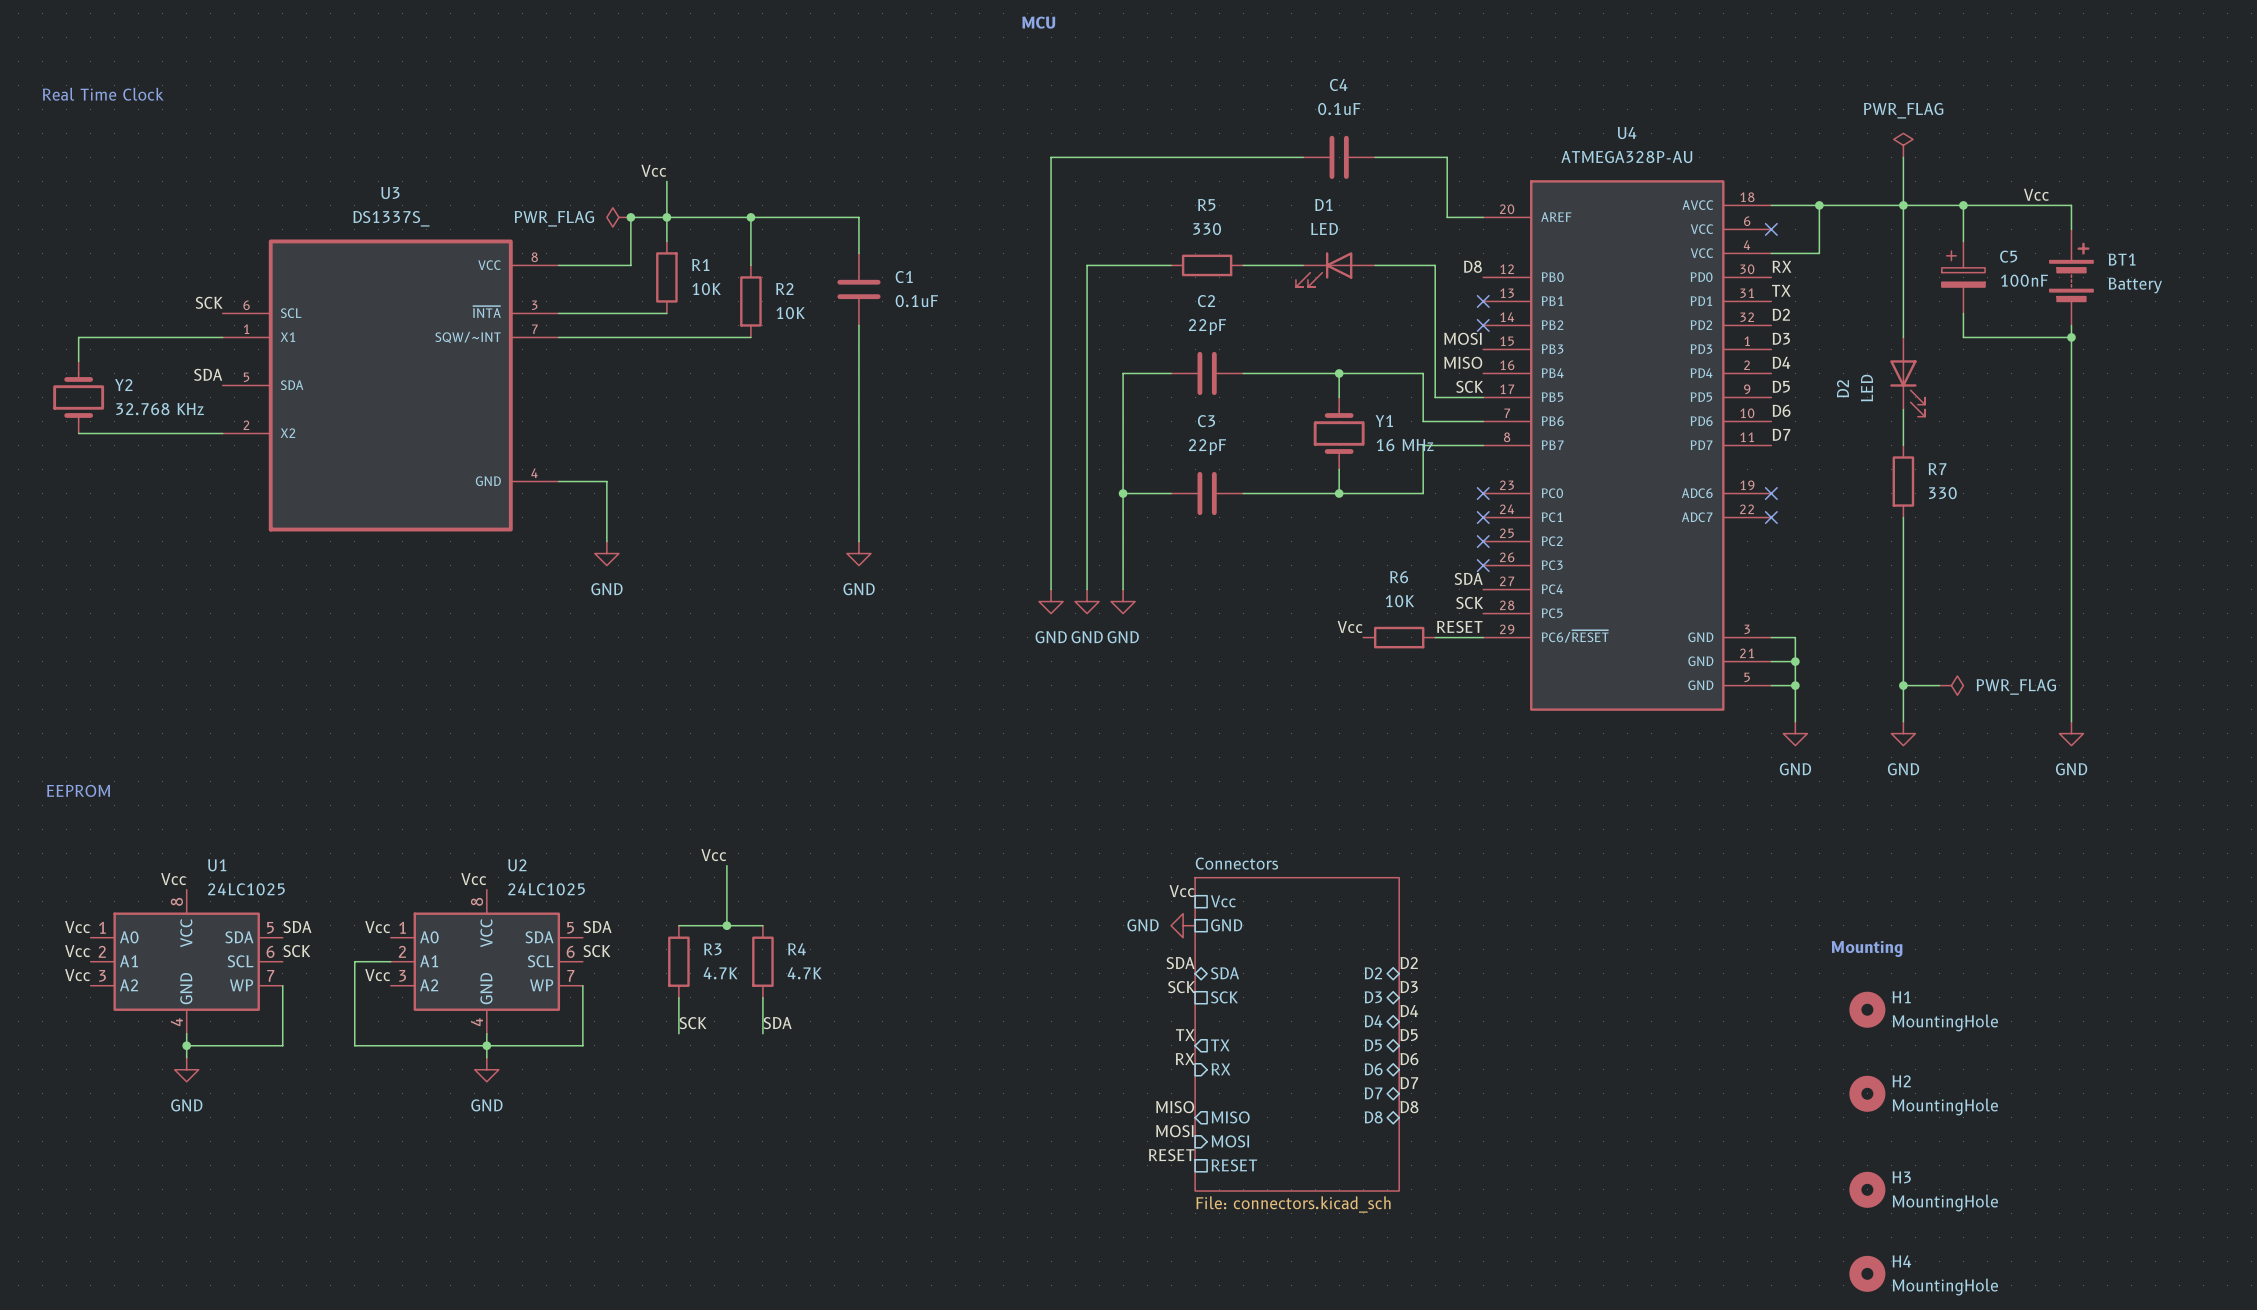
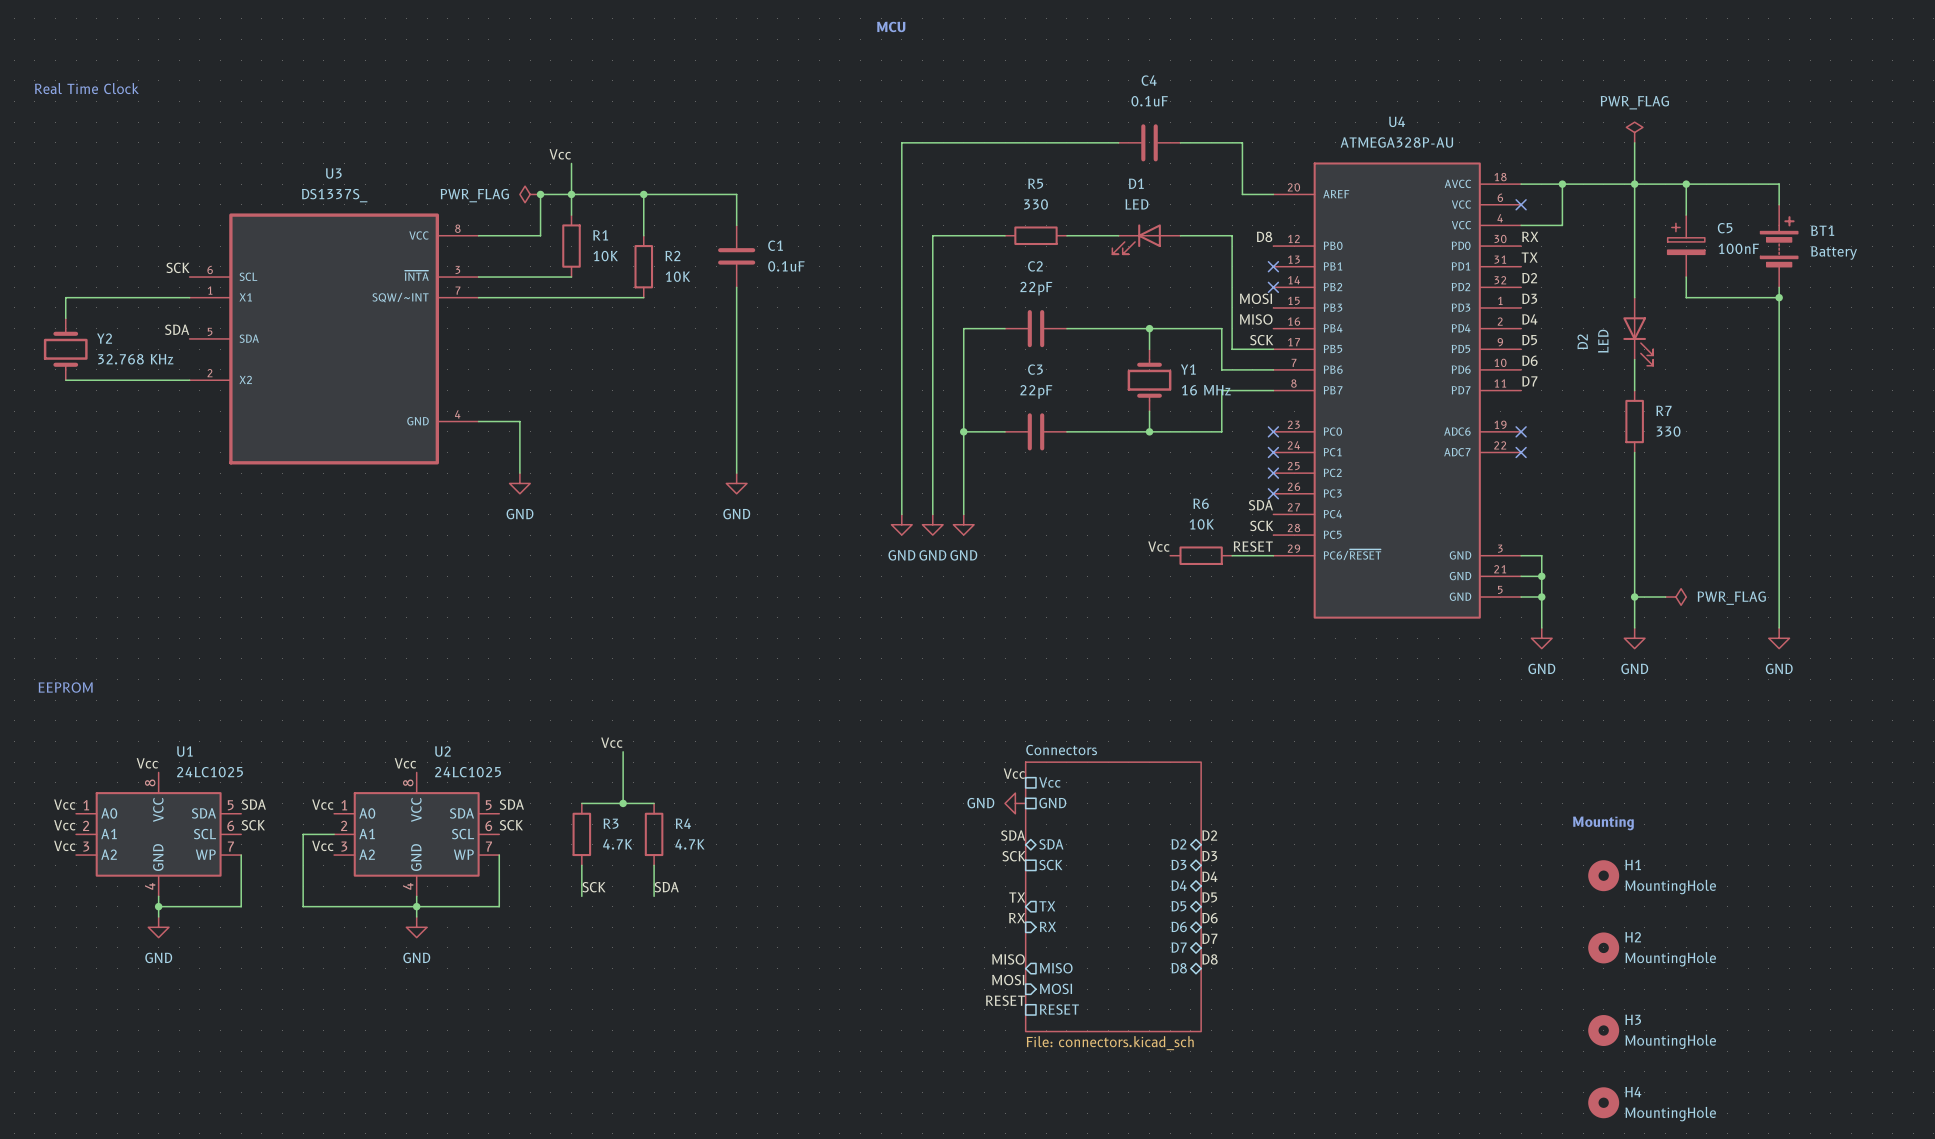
label: Vcc (2036, 194) -> none

